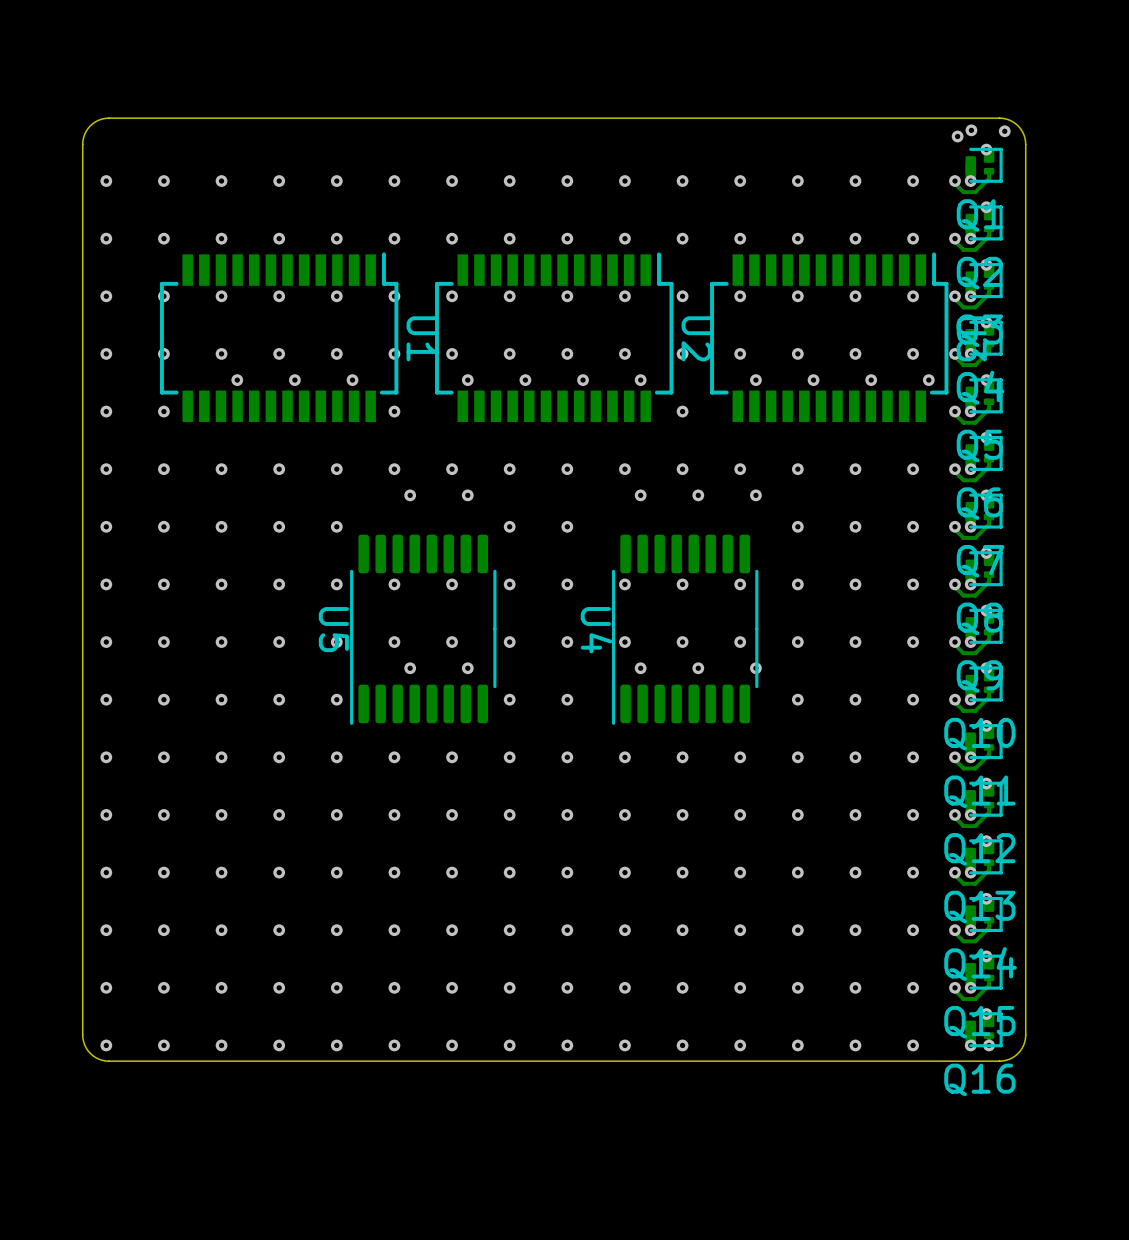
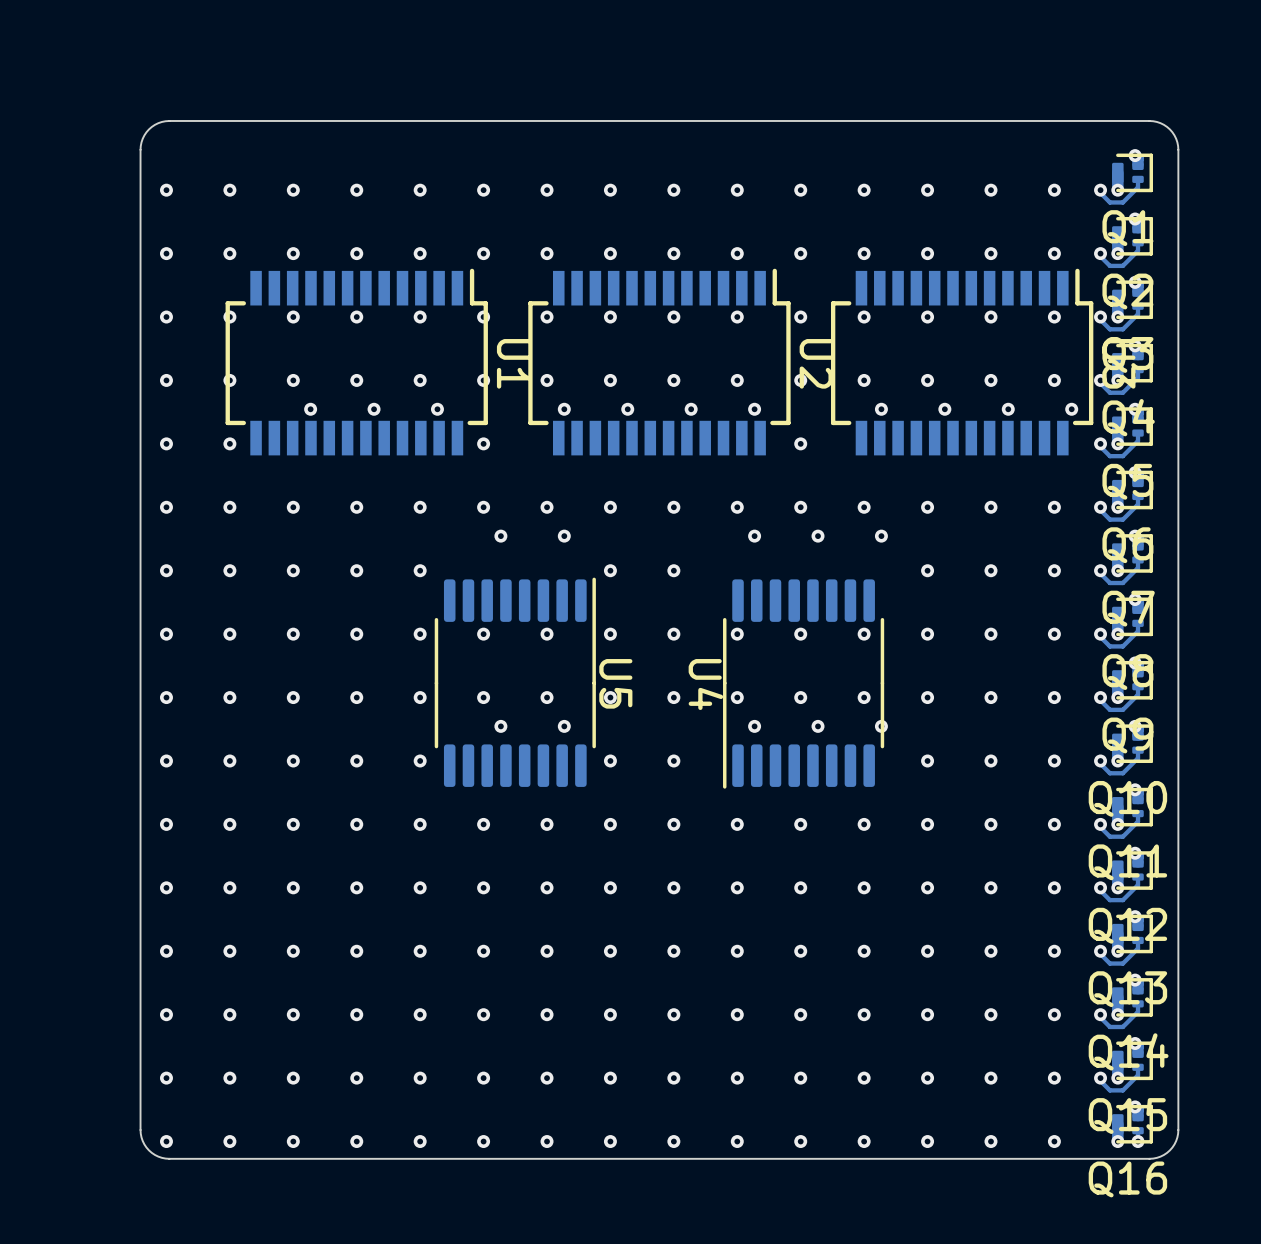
via: (971, 130) -> none
via: (1004, 131) -> none
via: (957, 136) -> none
U5 rotation: 0° (423, 629) -> 180° (515, 682)

